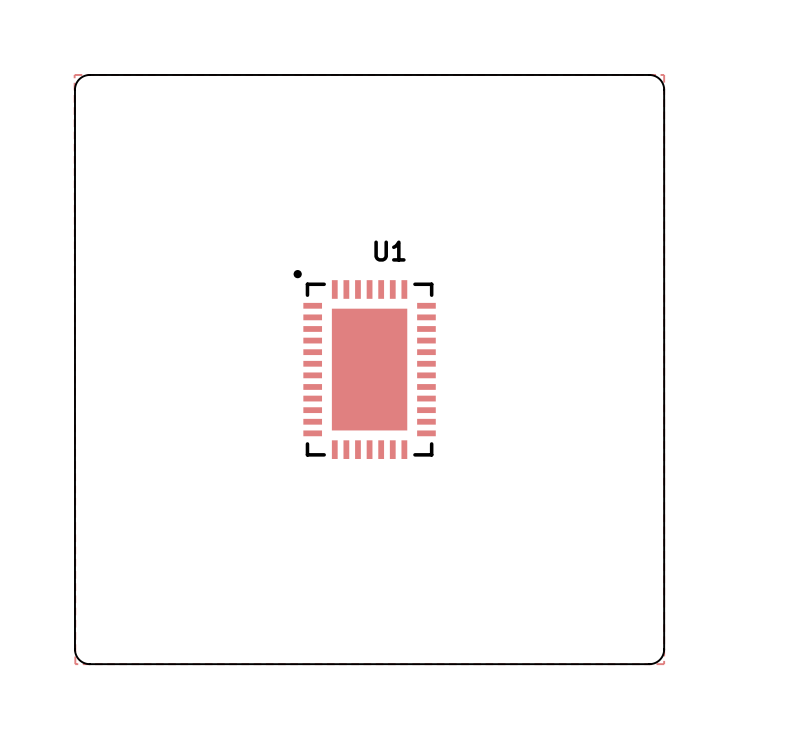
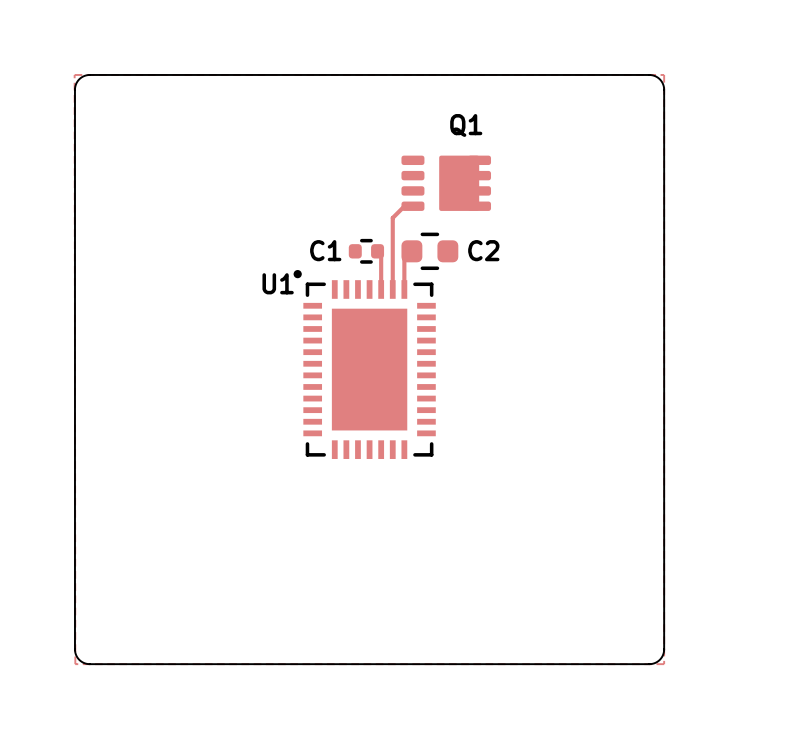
Q1: none -> (446, 183)
track: none -> (412, 206) (404, 206) (392, 217) (392, 289)
C1: none -> (366, 251)
track: none -> (377, 251) (381, 254) (381, 289)
U1 name position: U1 (389, 251) -> U1 (278, 283)
track: none -> (411, 251) (404, 258) (404, 289)
C2: none -> (429, 251)

